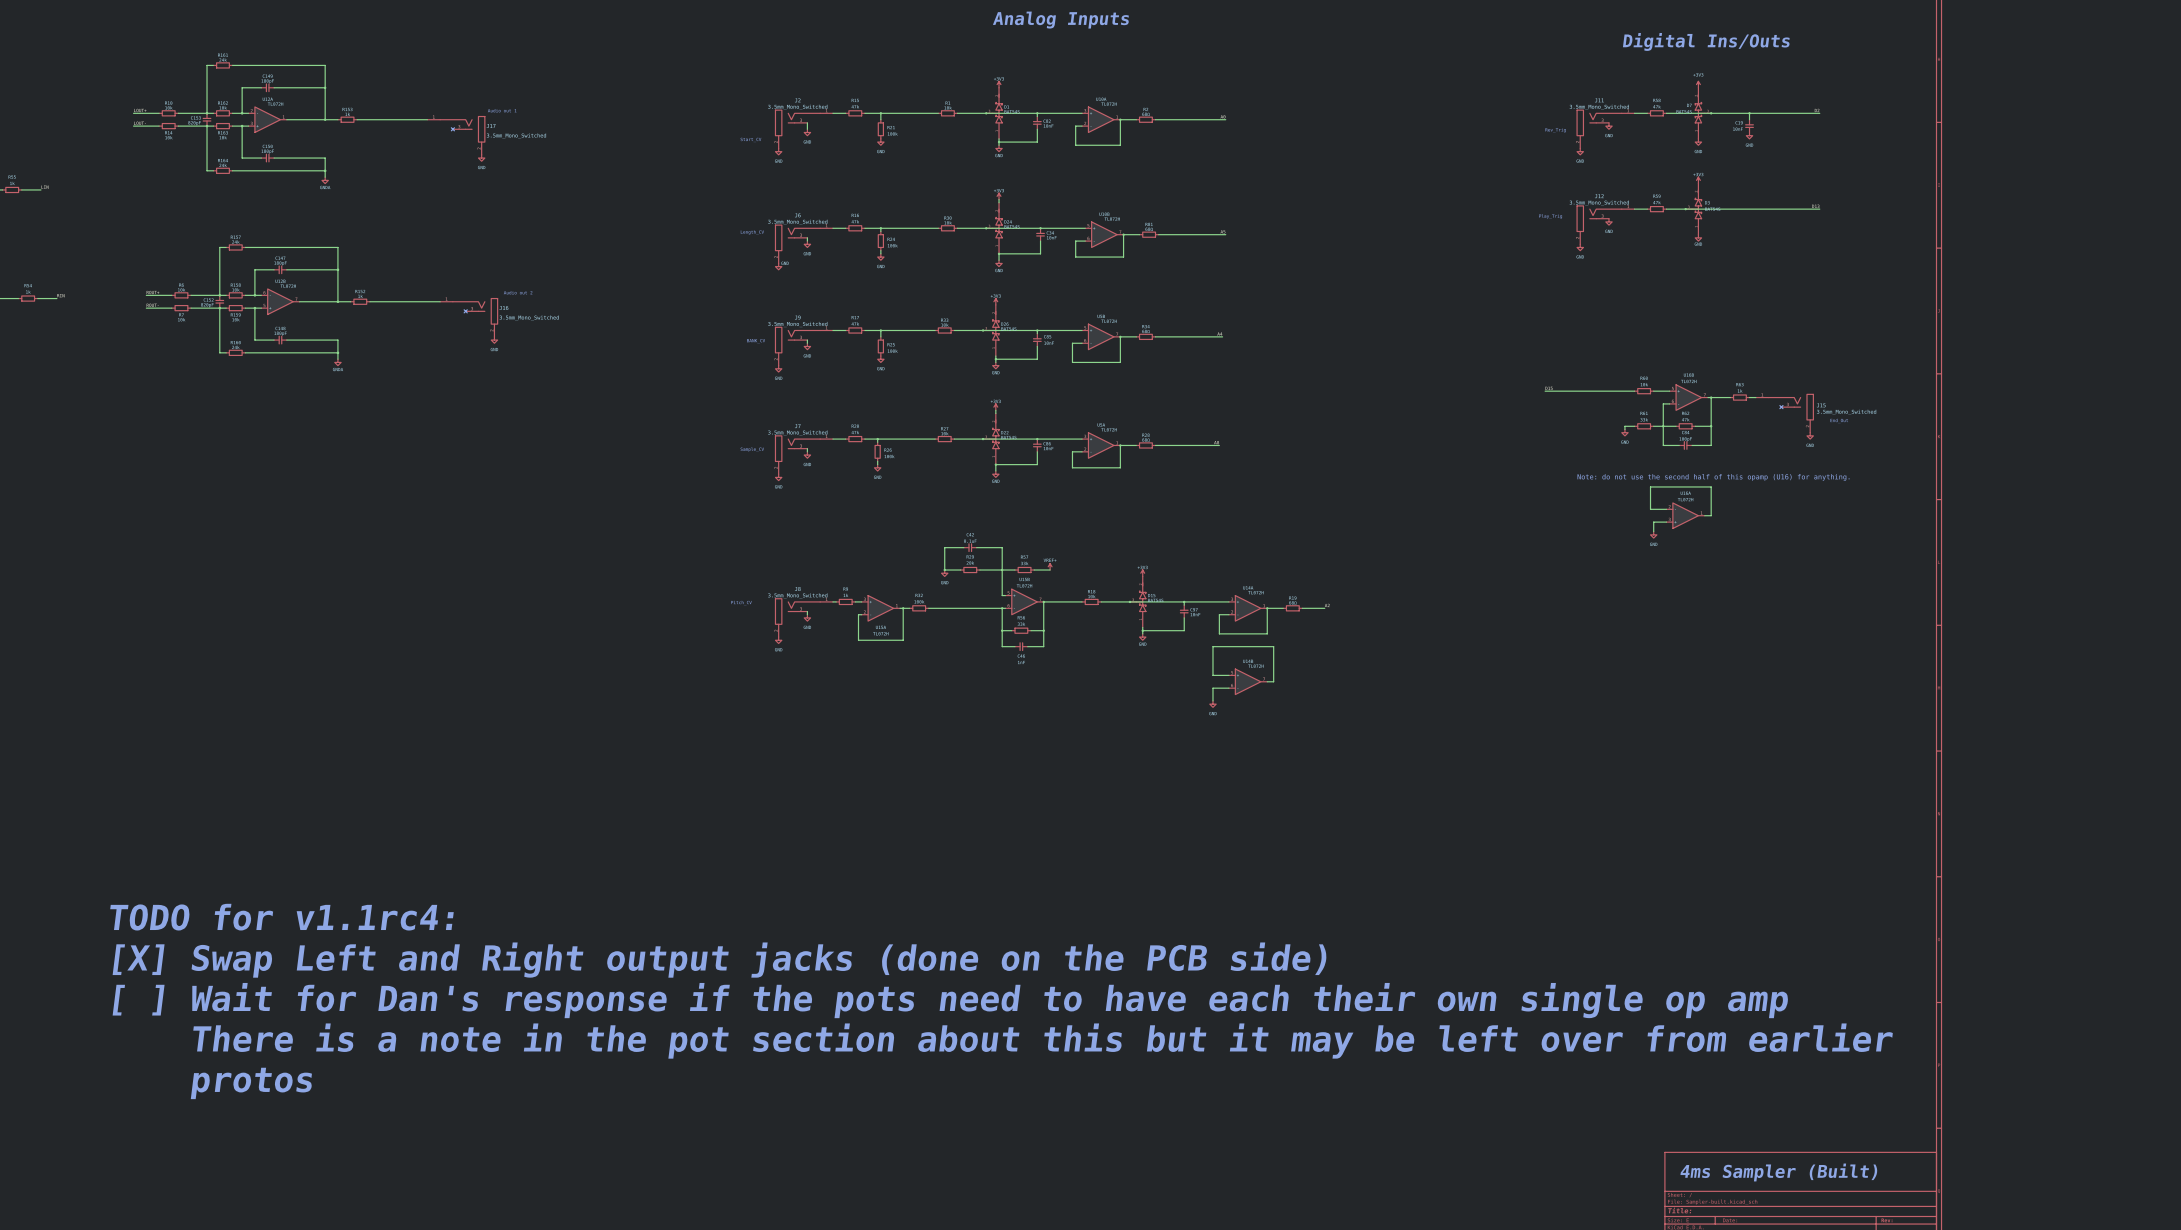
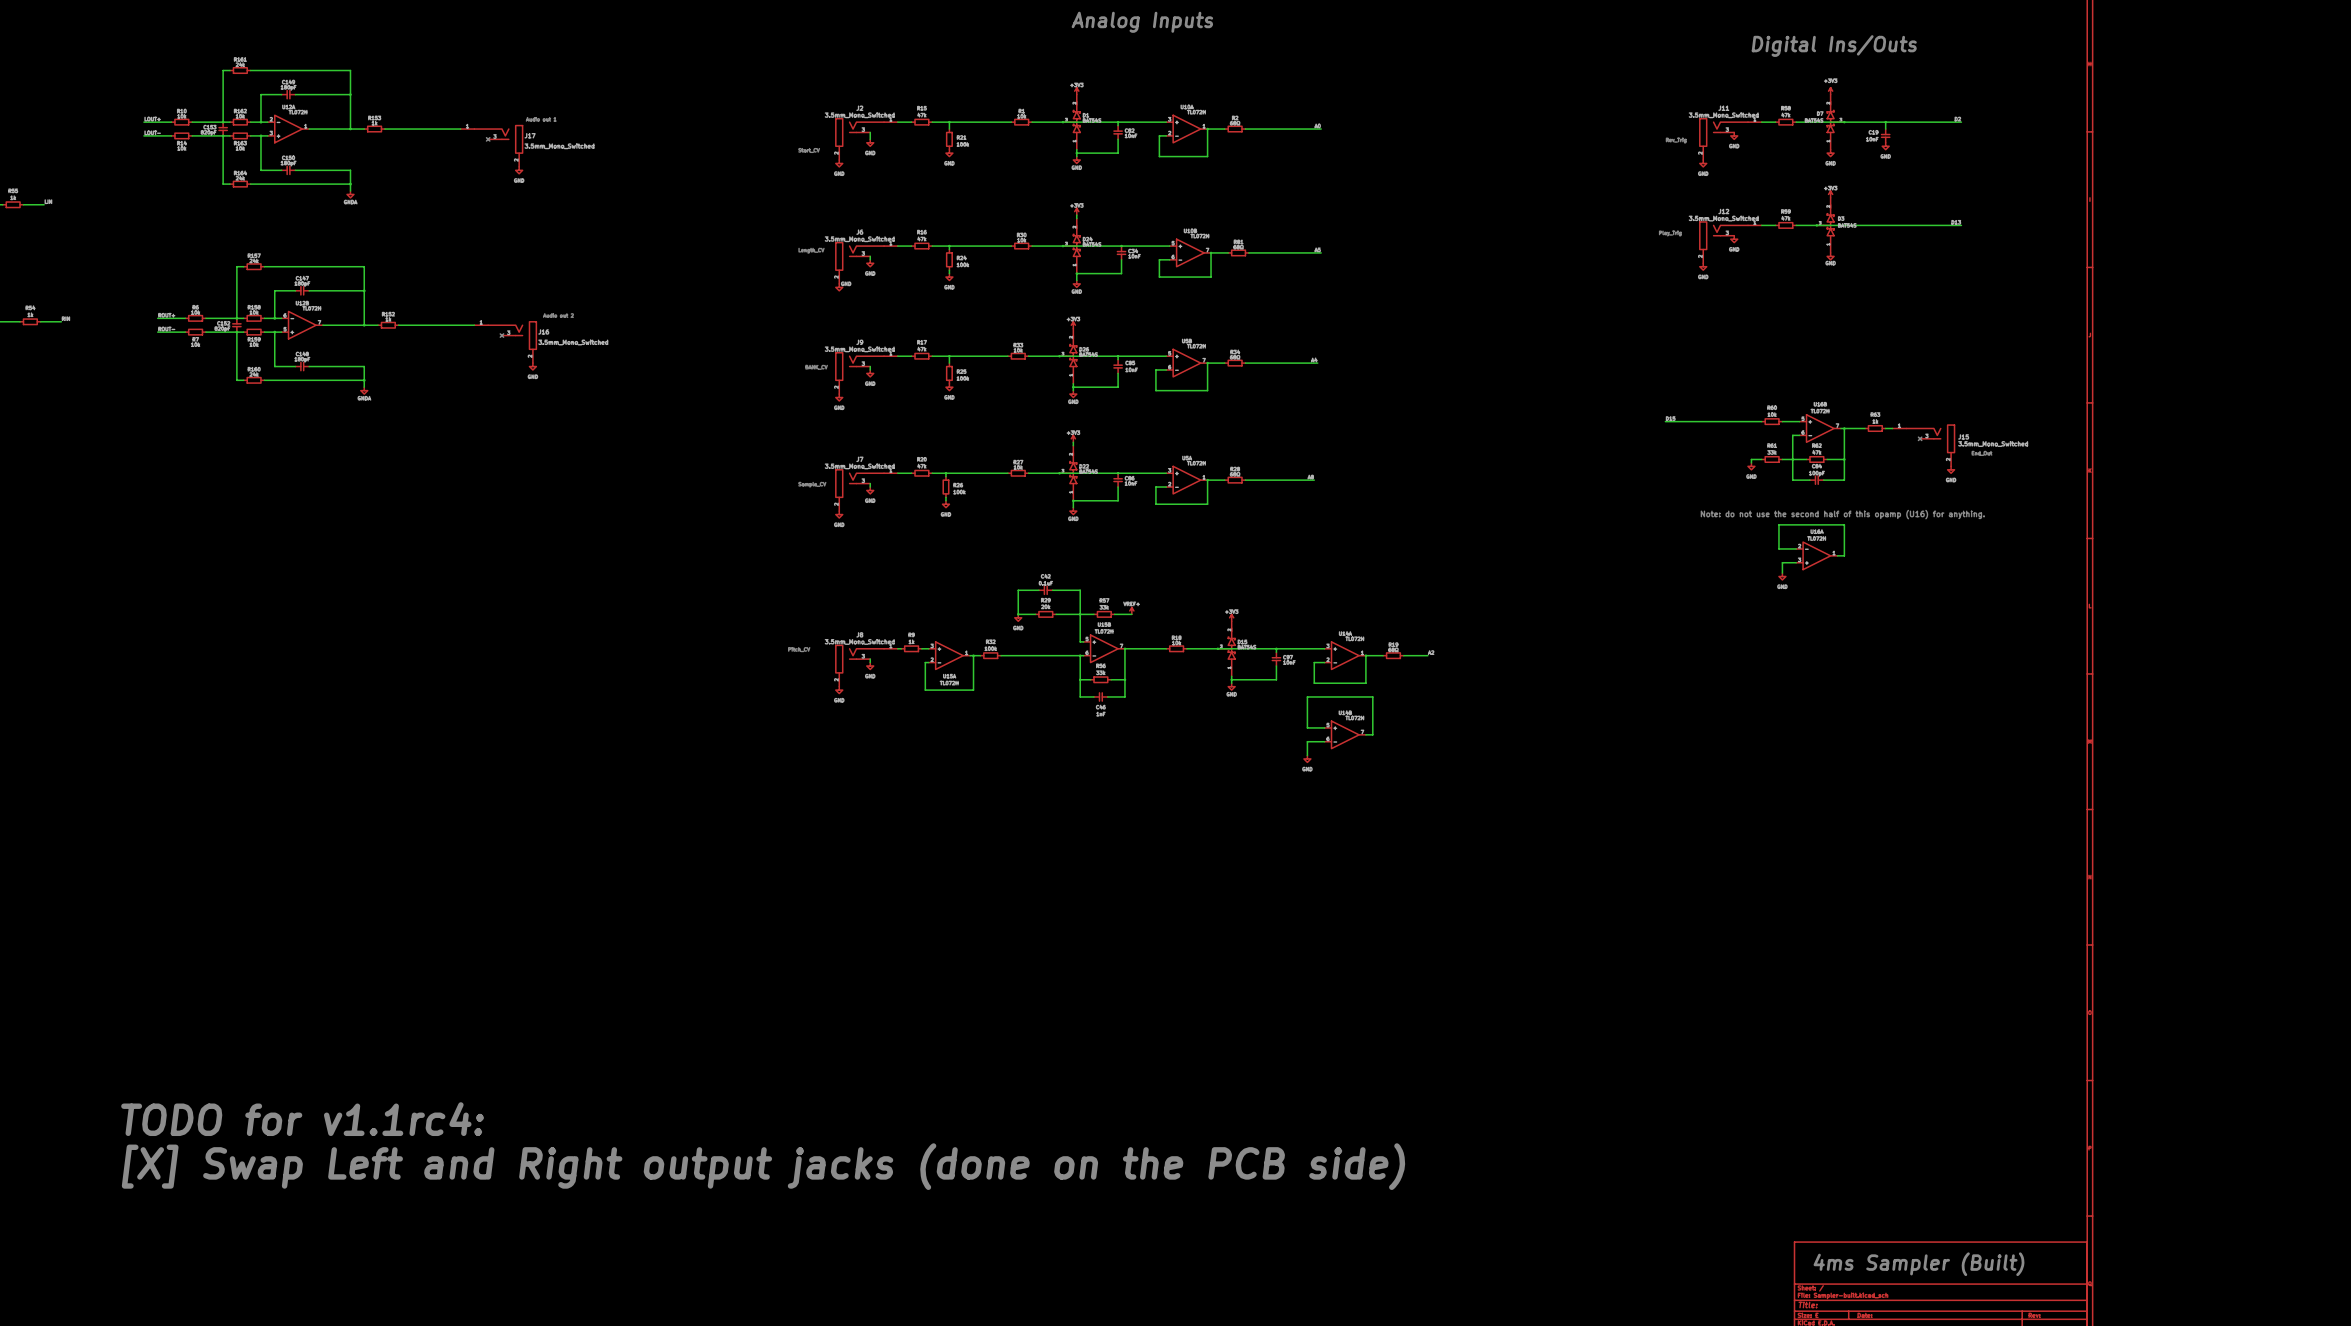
text: TODO for v1.1rc4: (281, 917) -> none
text: [X] Swap Left and Right output jacks (done on the PCB side) (719, 960) -> none
text: [ ] Wait for Dan's response if the pots need to have each their own single op amp (950, 1000) -> none
text: There is a note in the pot section about this but it may be left over from earlier (1043, 1041) -> TODO for v1.1rc4: (302, 1119)
text: protos (251, 1083) -> [X] Swap Left and Right output jacks (done on the PCB side) (763, 1166)

